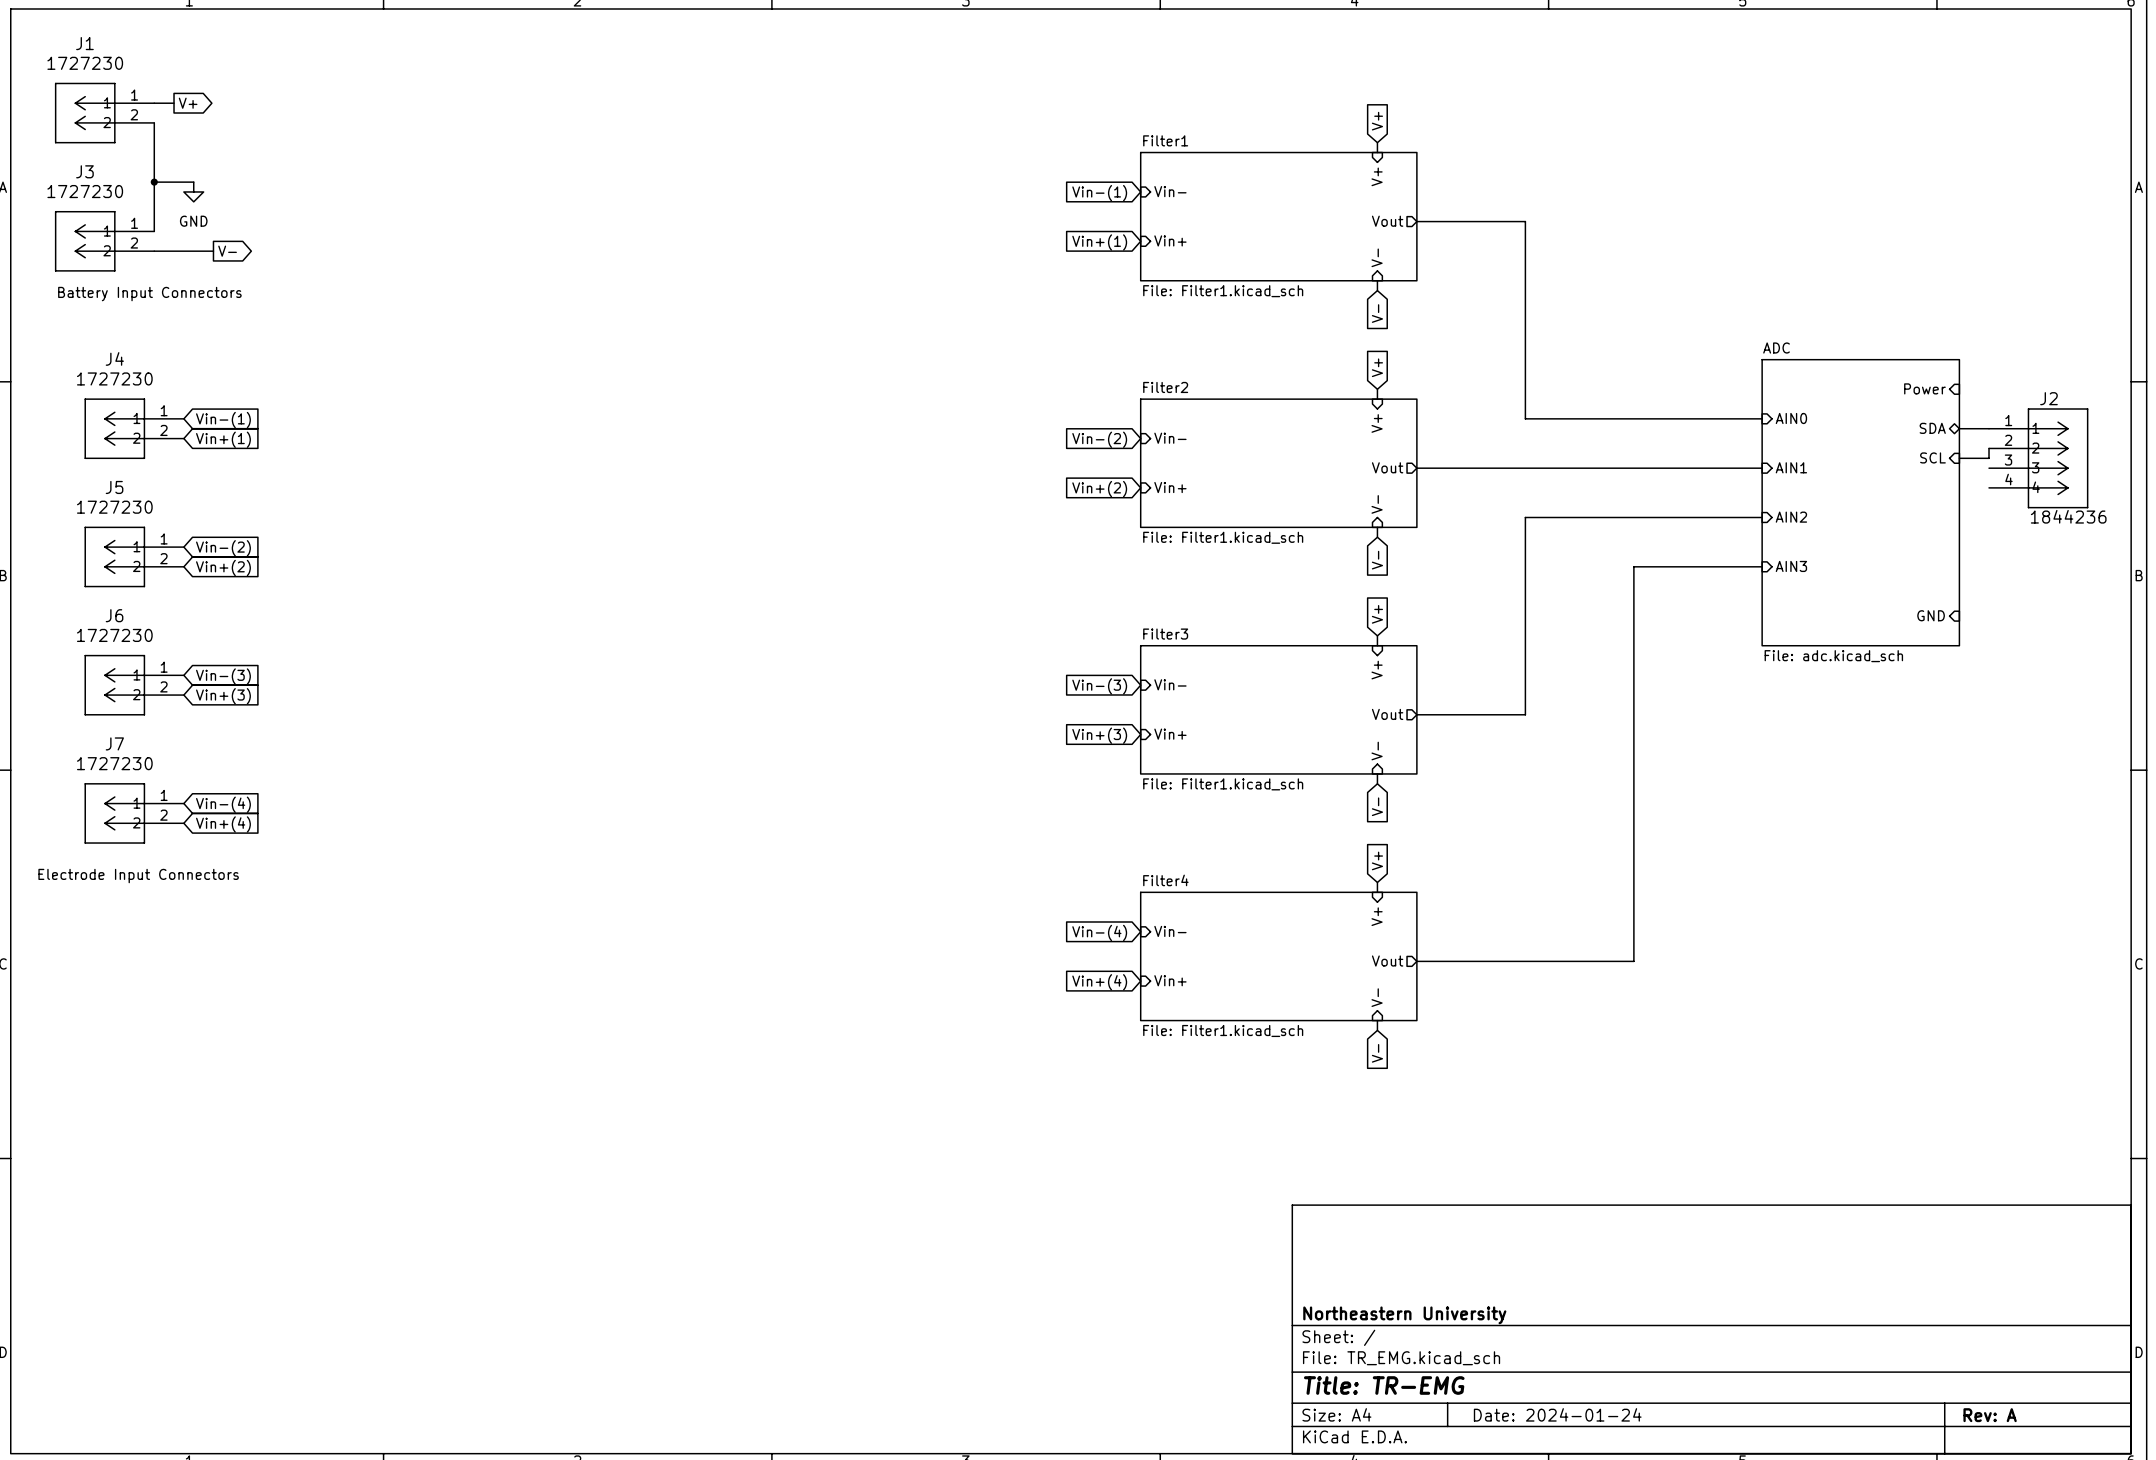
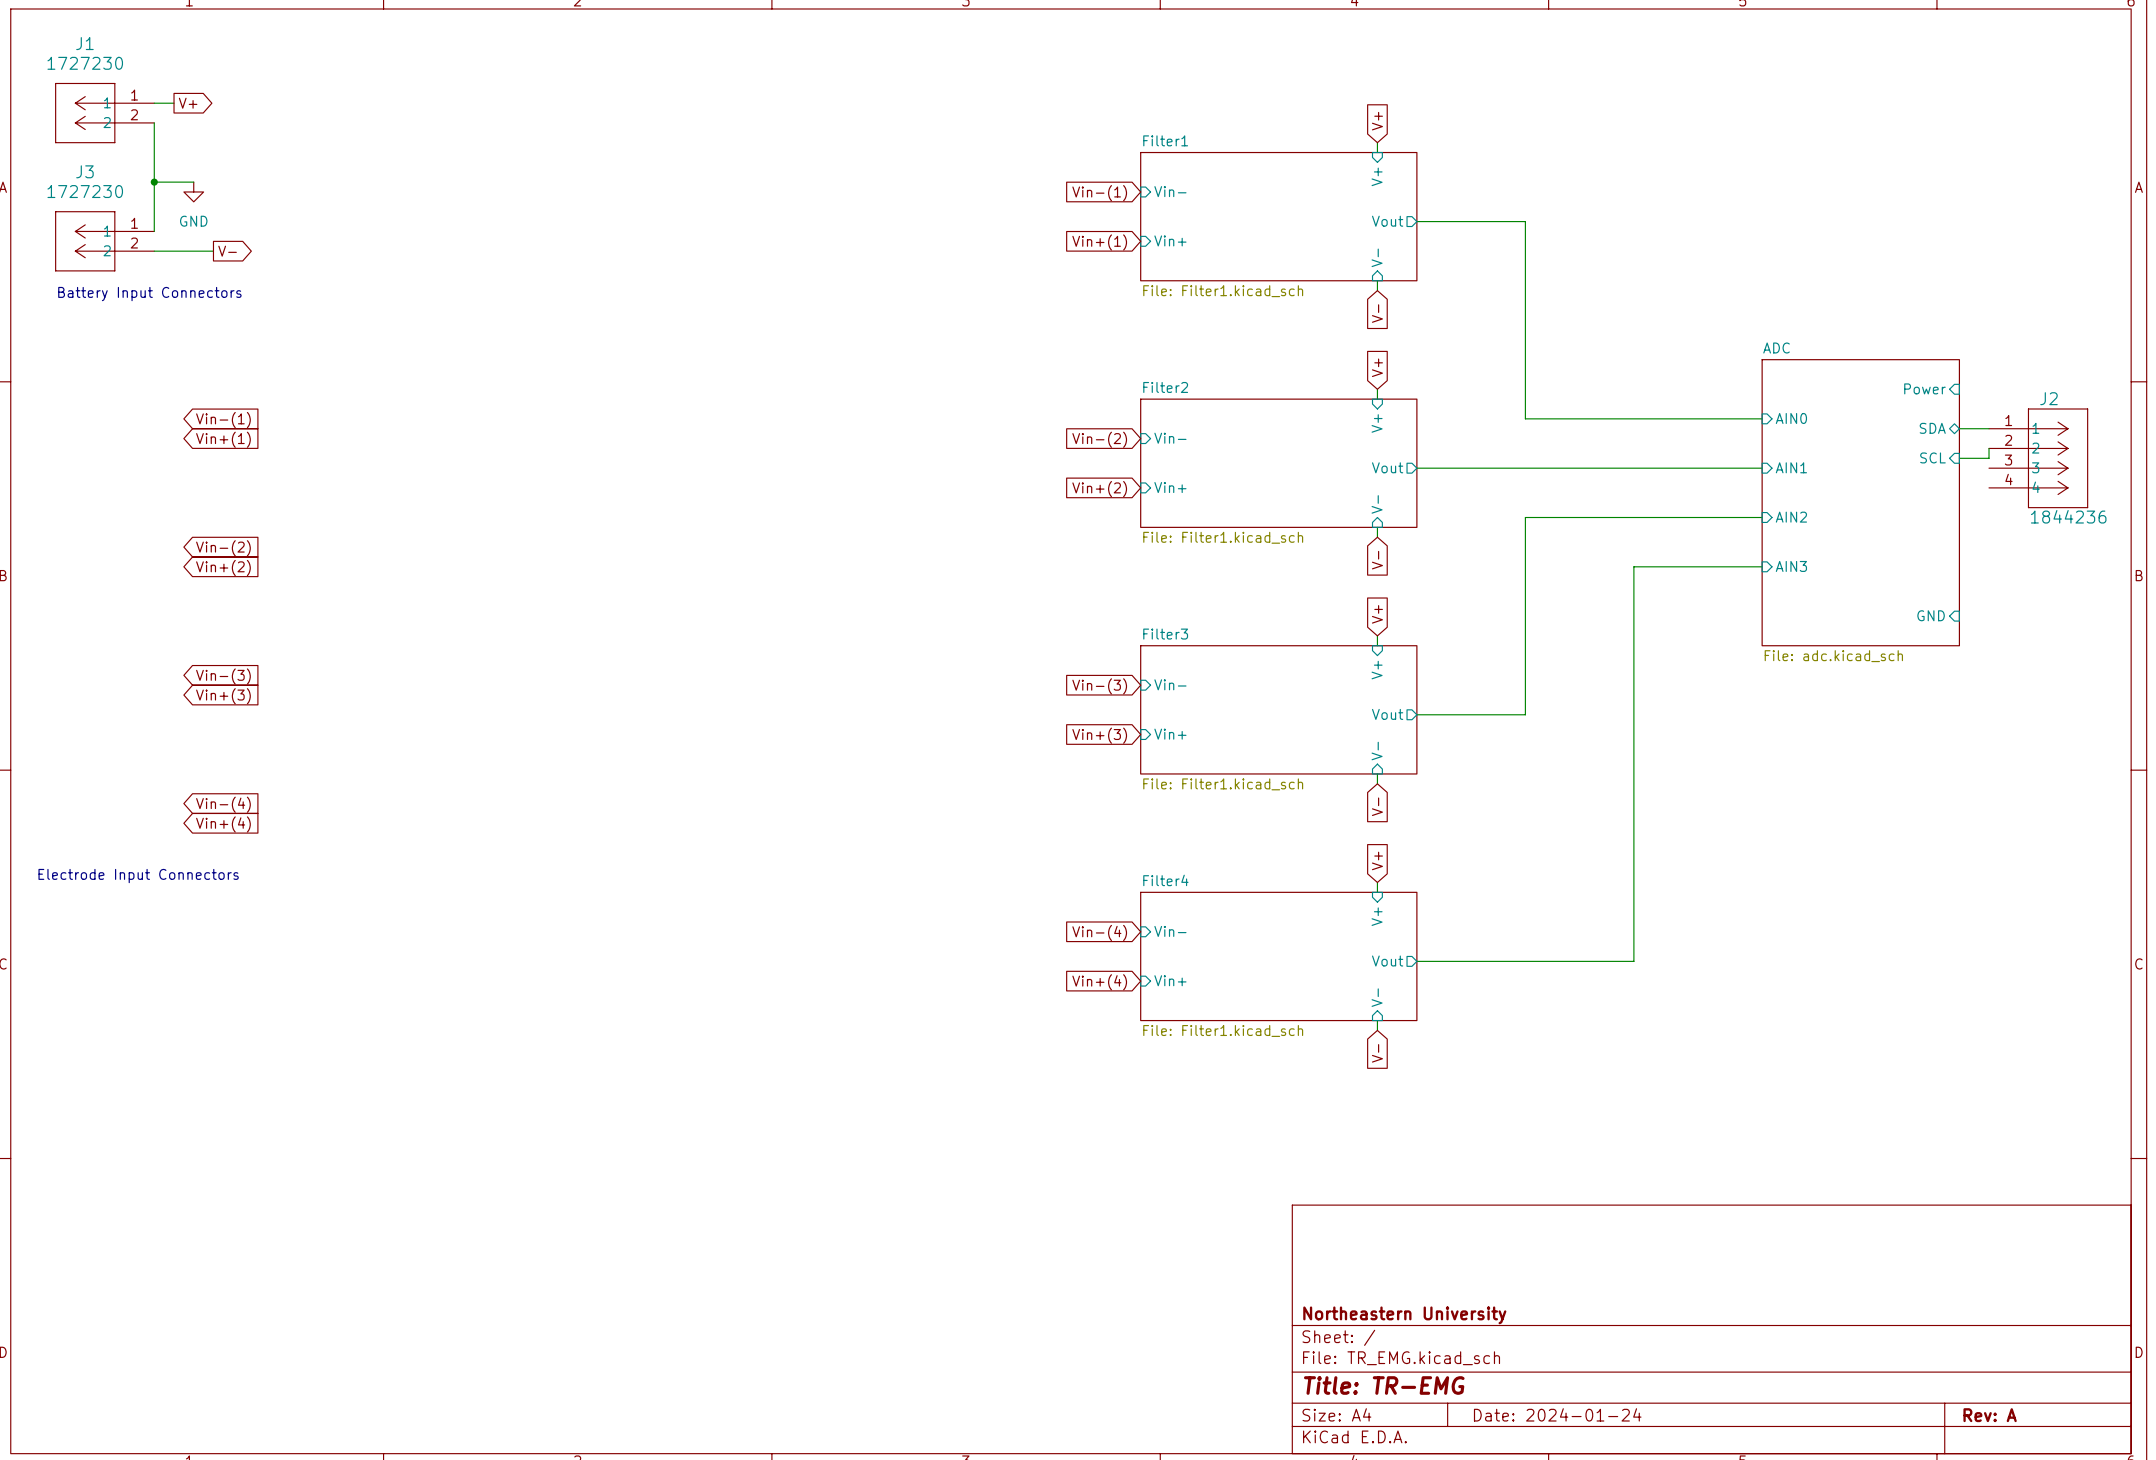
J4: 1727230 (134, 428) -> none
J5: 1727230 (134, 556) -> none
J6: 1727230 (134, 685) -> none
J7: 1727230 (134, 813) -> none

